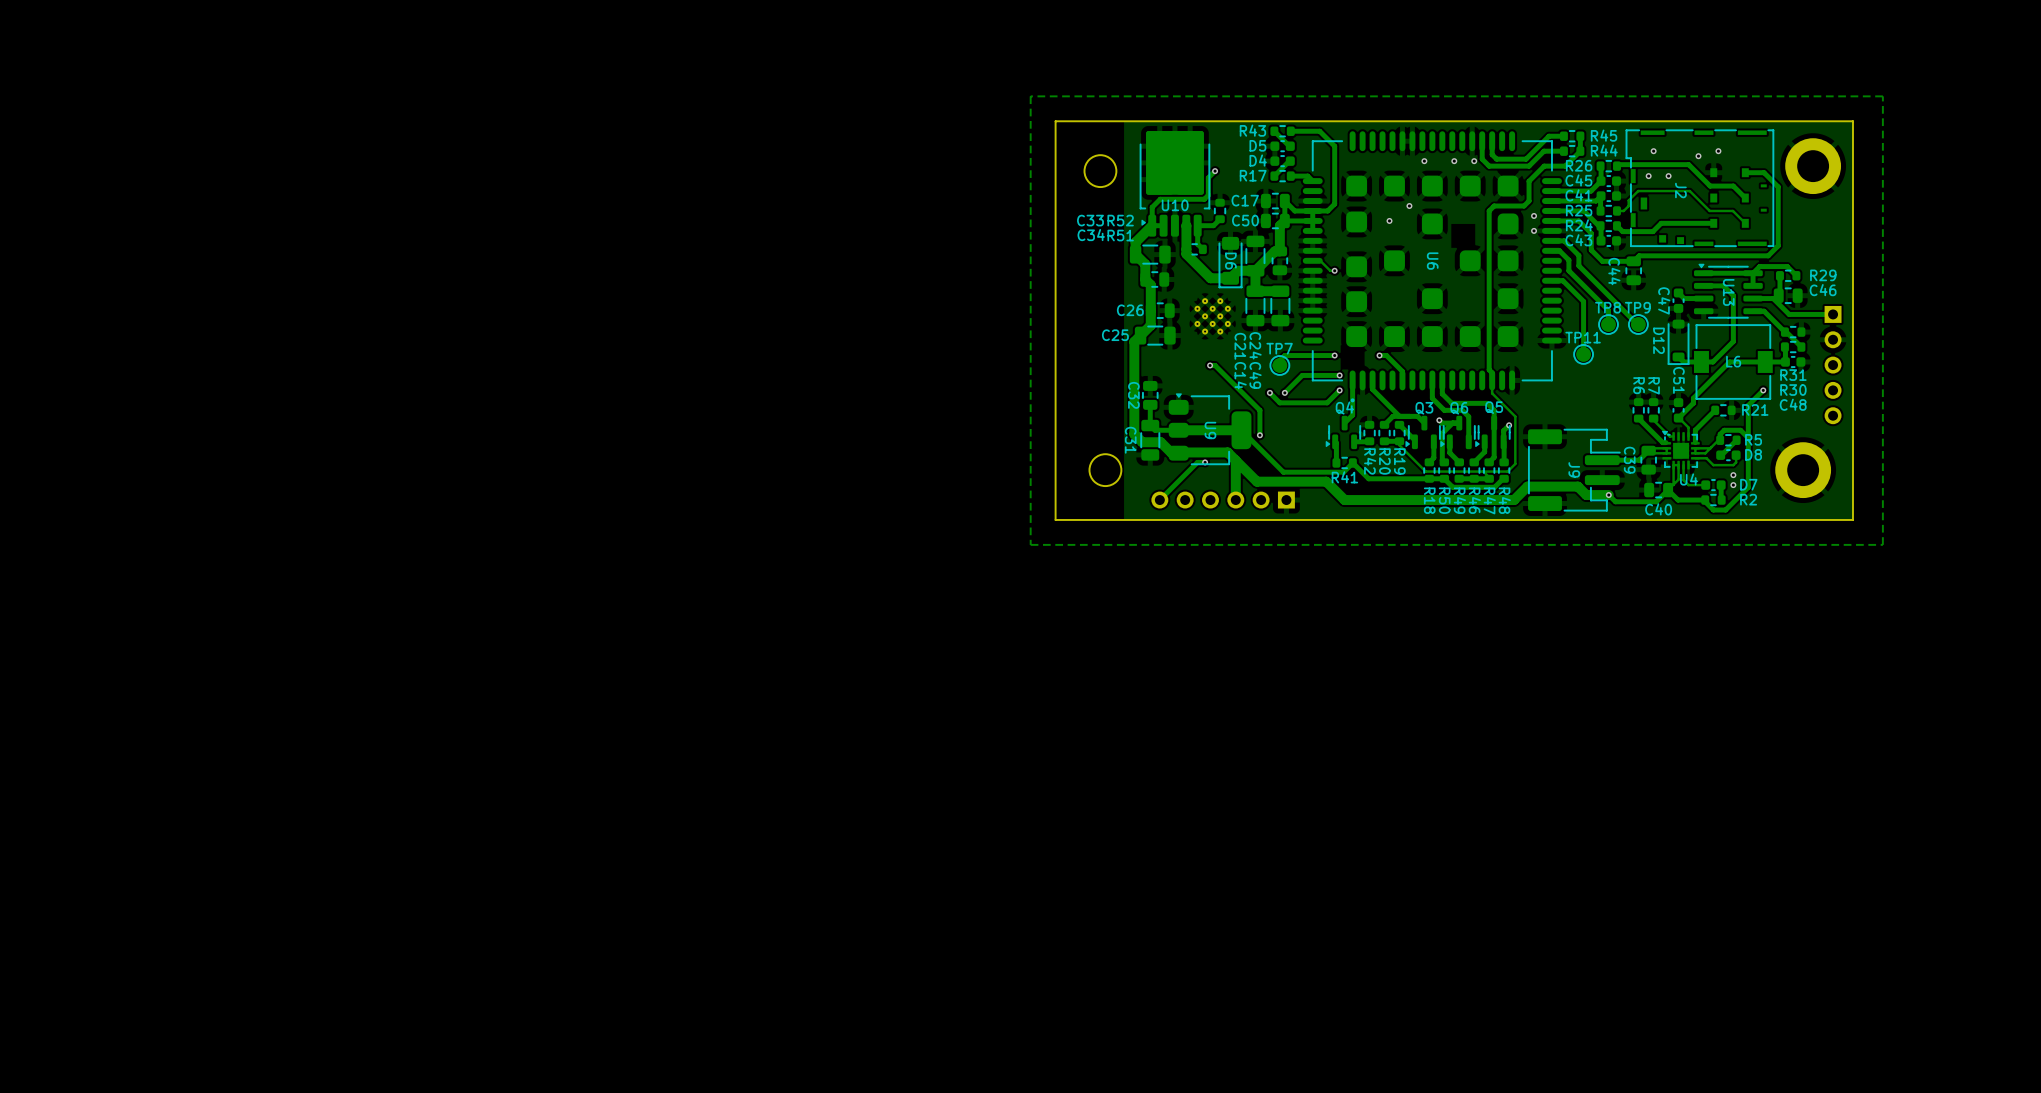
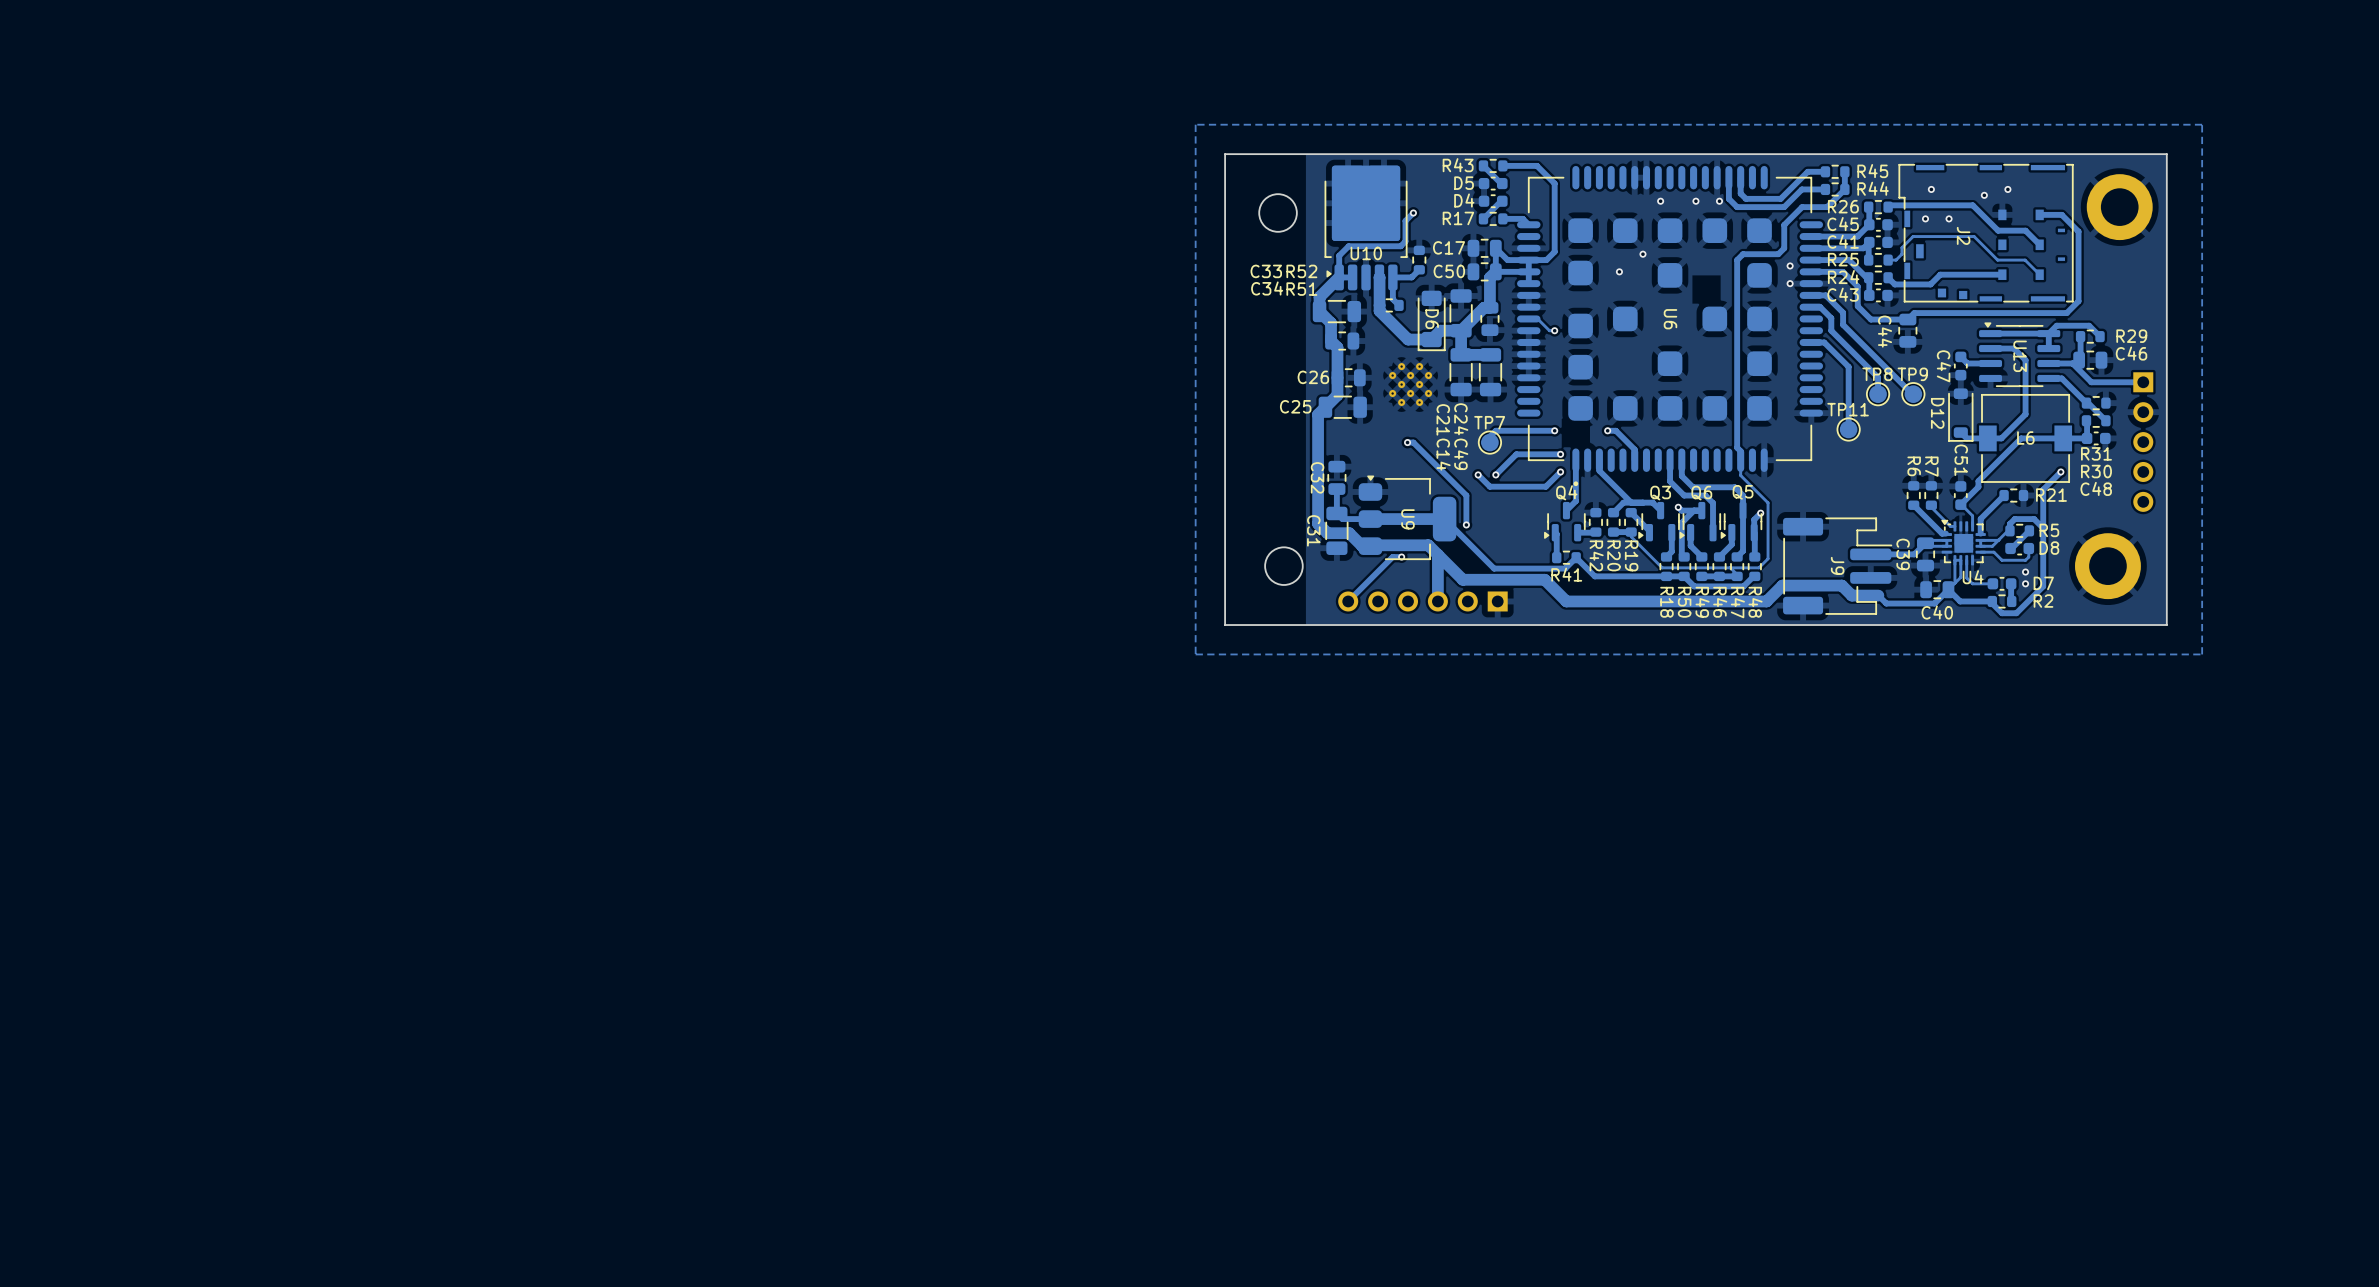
via: (1608, 495) -> none

